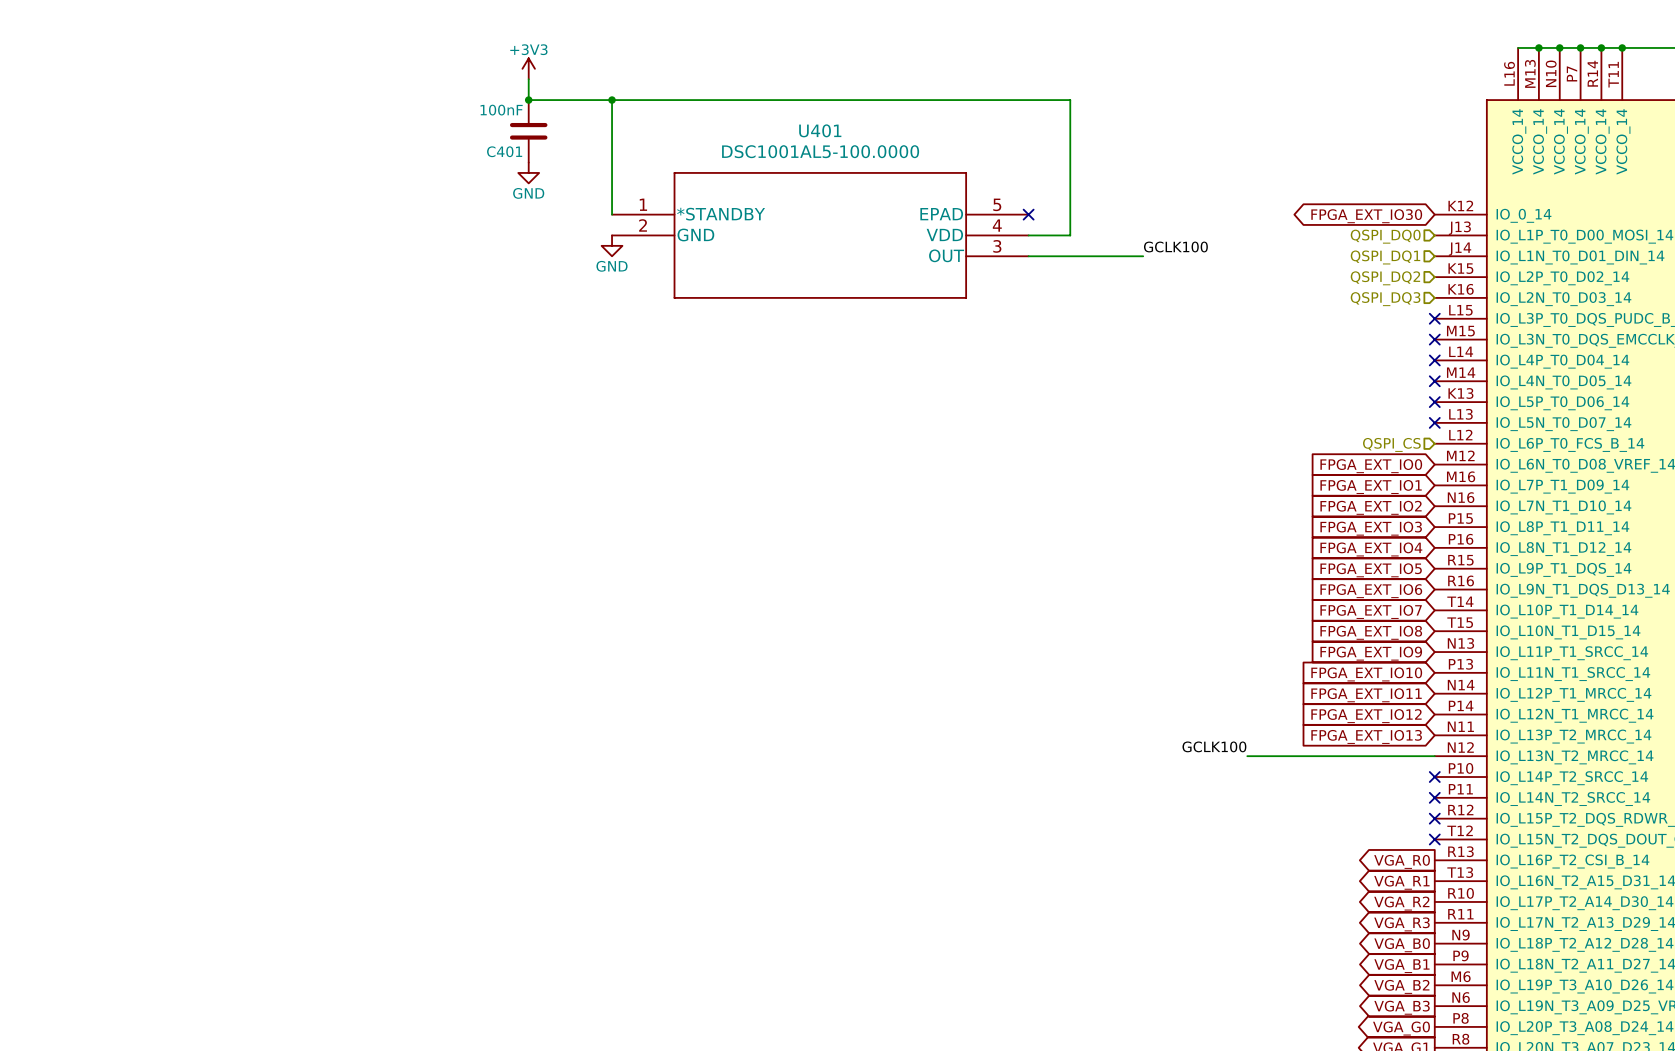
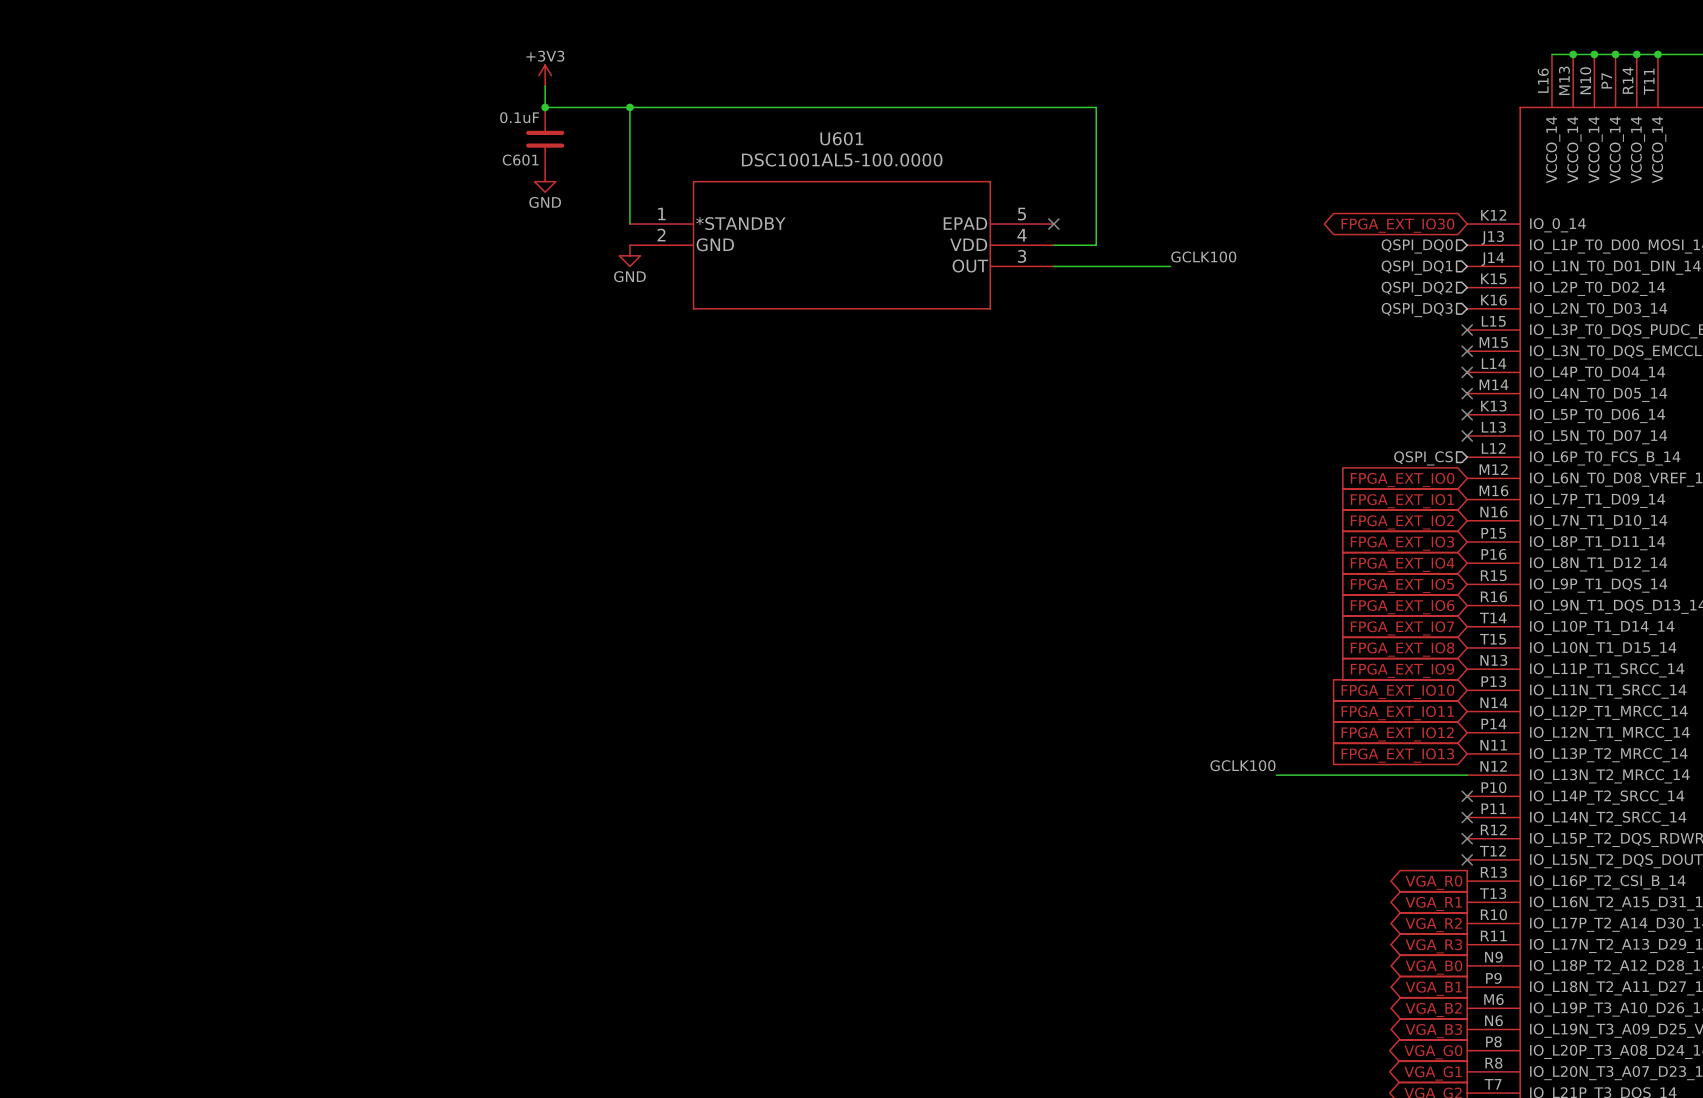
C401 value: 100nF (501, 110) -> 0.1uF (519, 117)
U401 name: U401 (820, 130) -> U601 (841, 138)
C401 name: C401 (504, 151) -> C601 (520, 160)

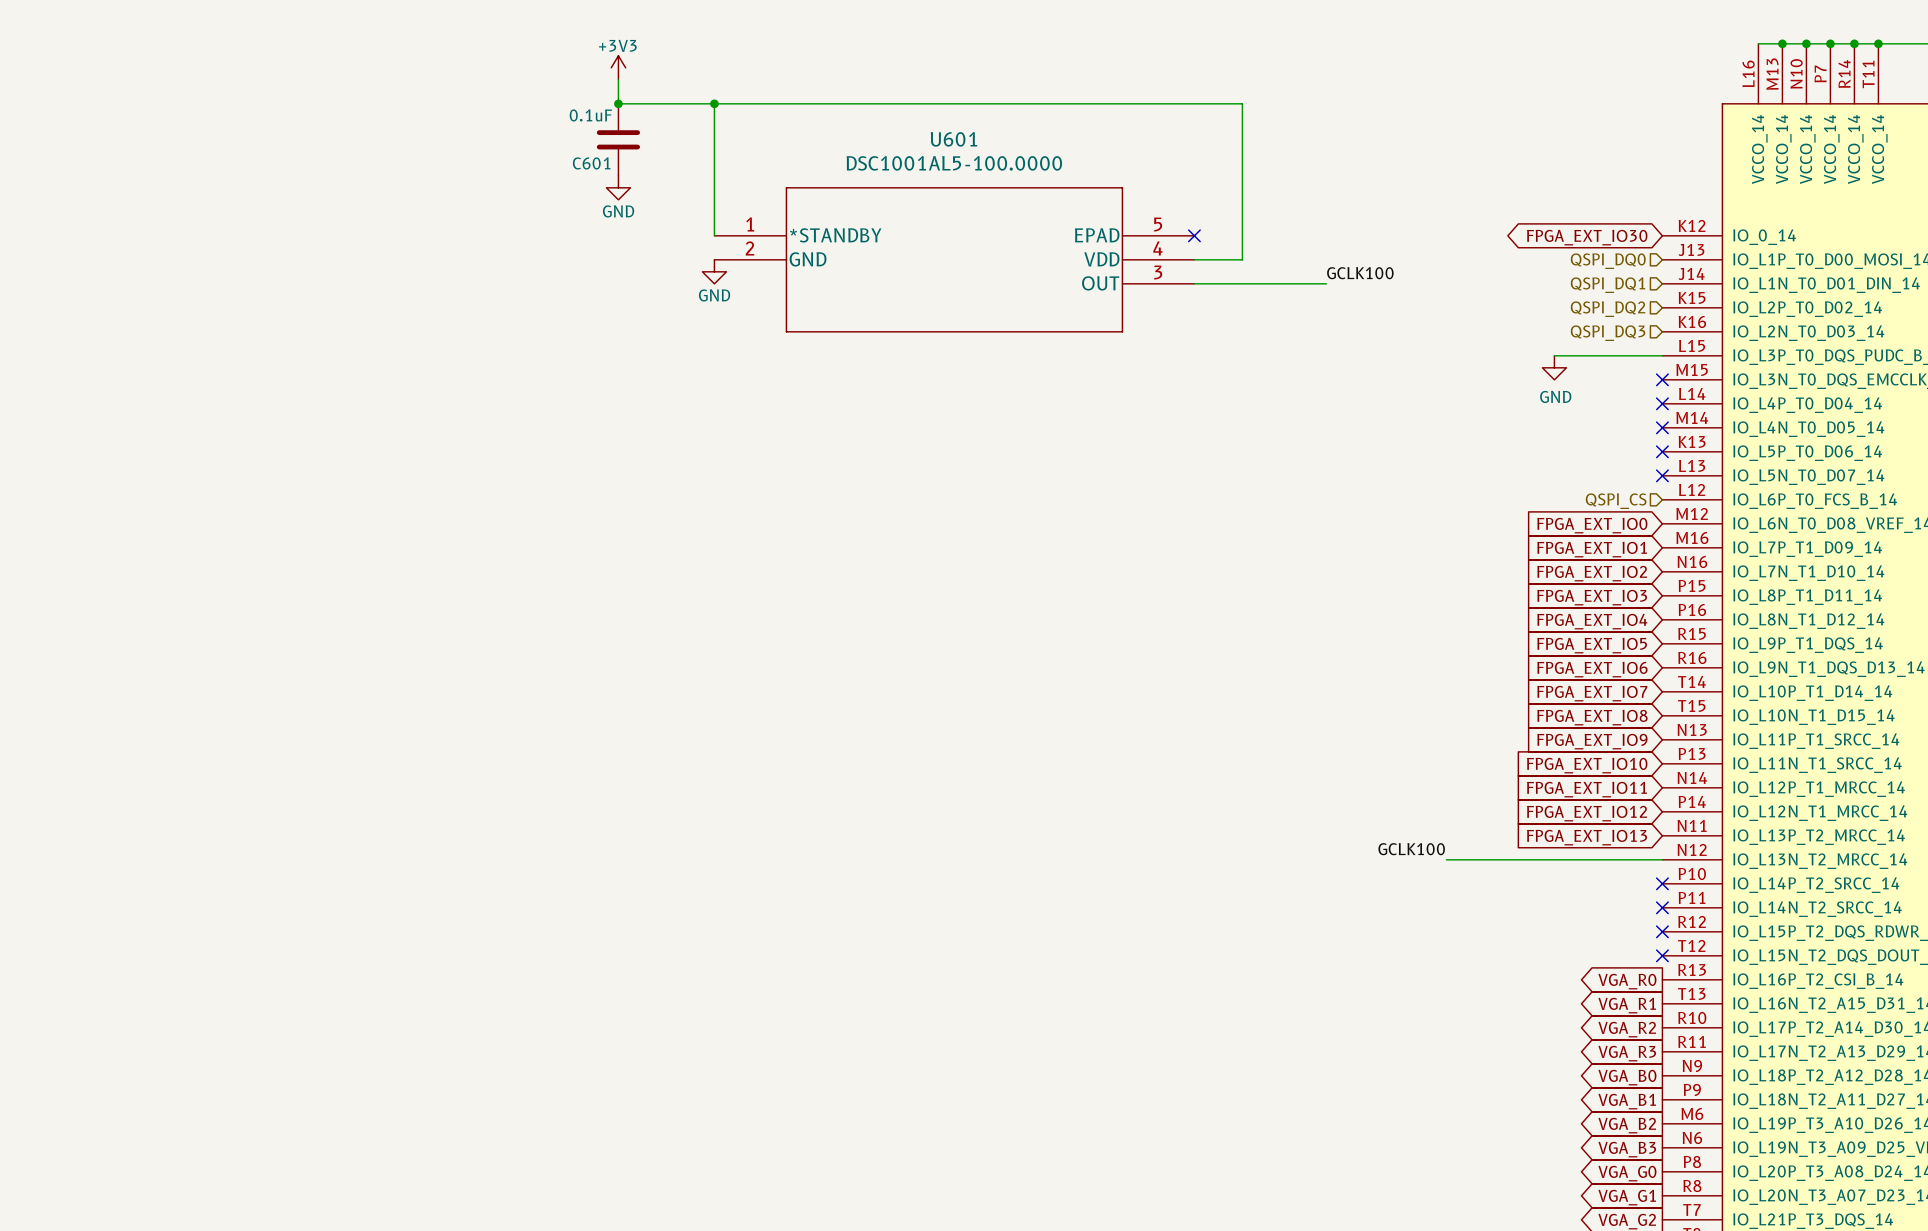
wire: none -> (1554, 355) (1662, 355)
no-connect mark: (1467, 330) -> none
power symbol: none -> GND (1554, 367)

